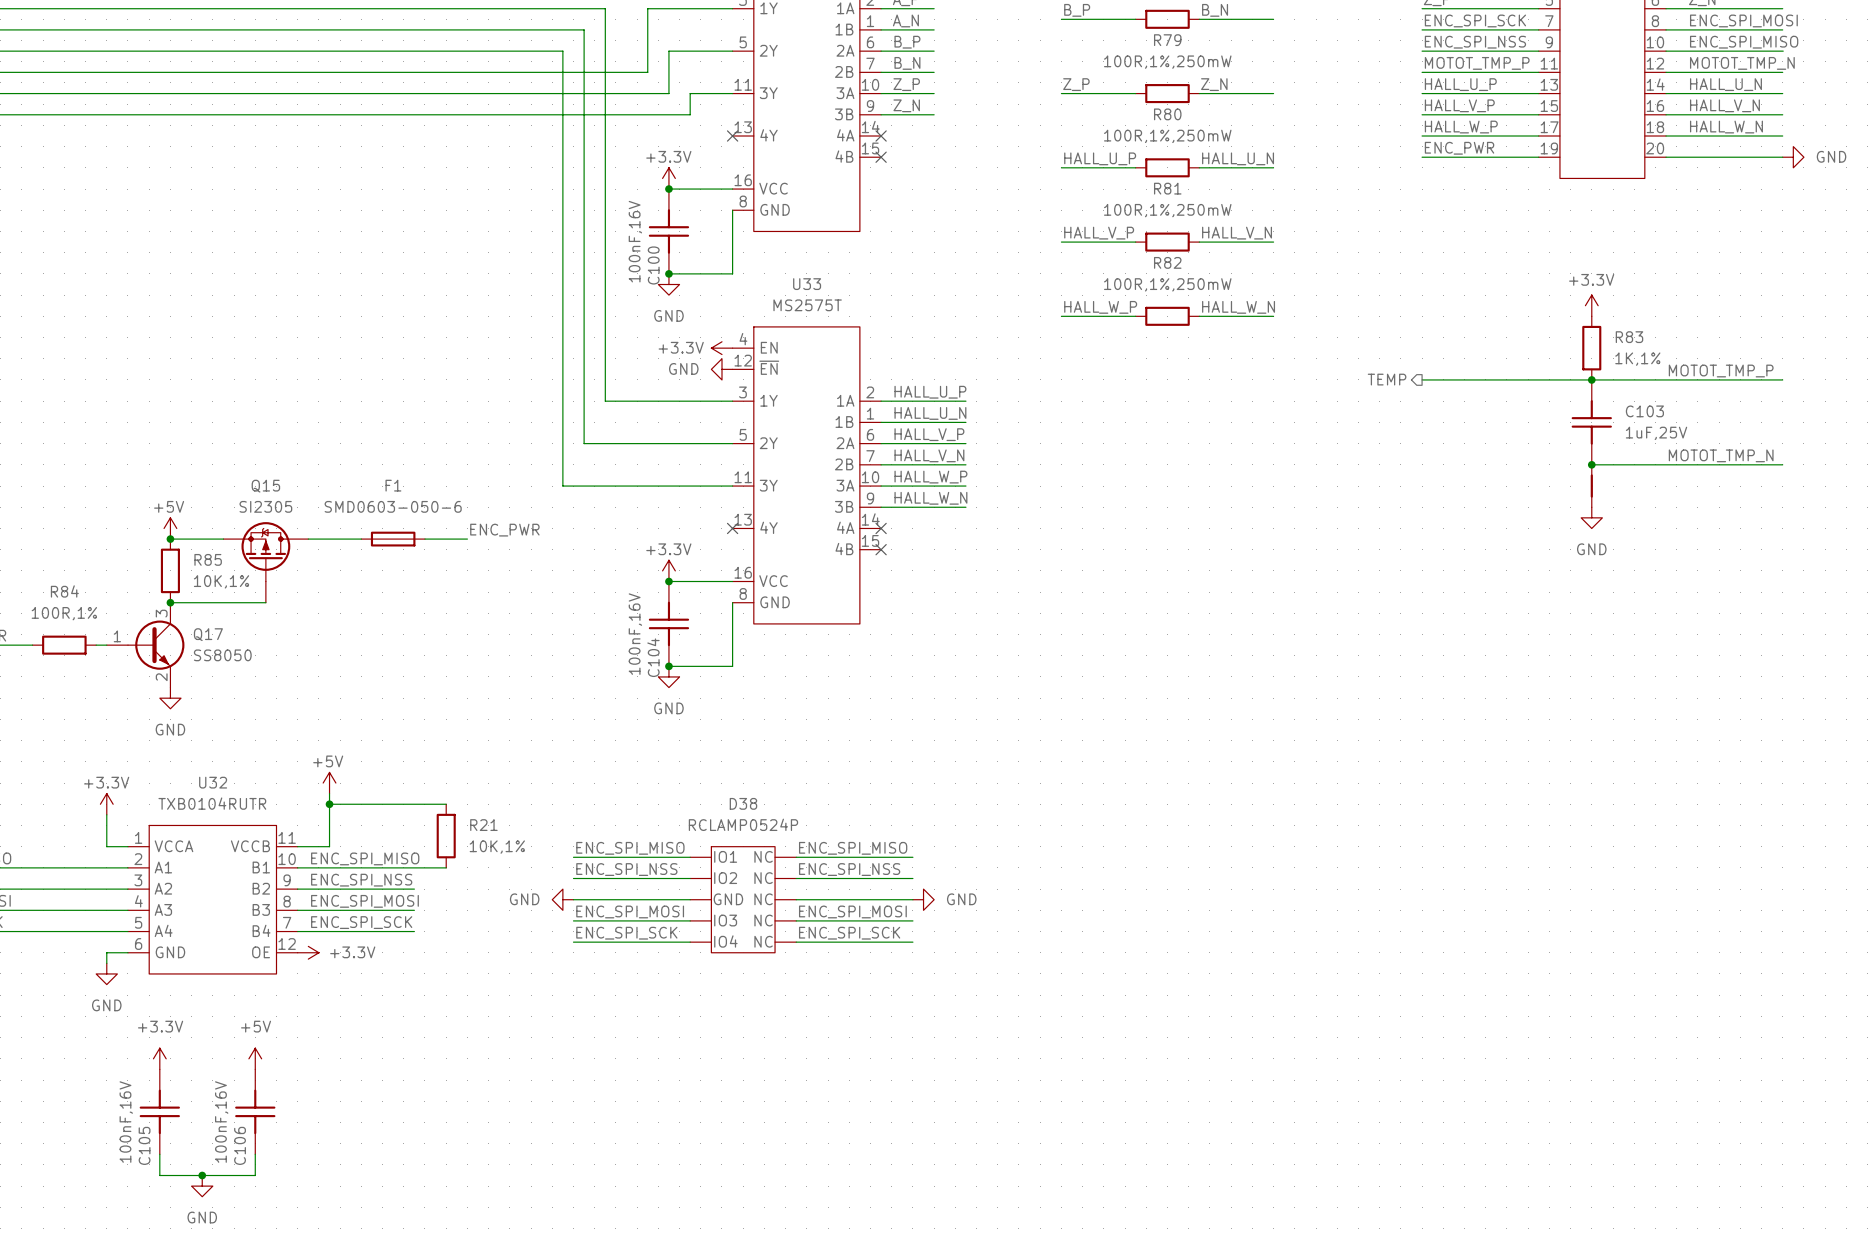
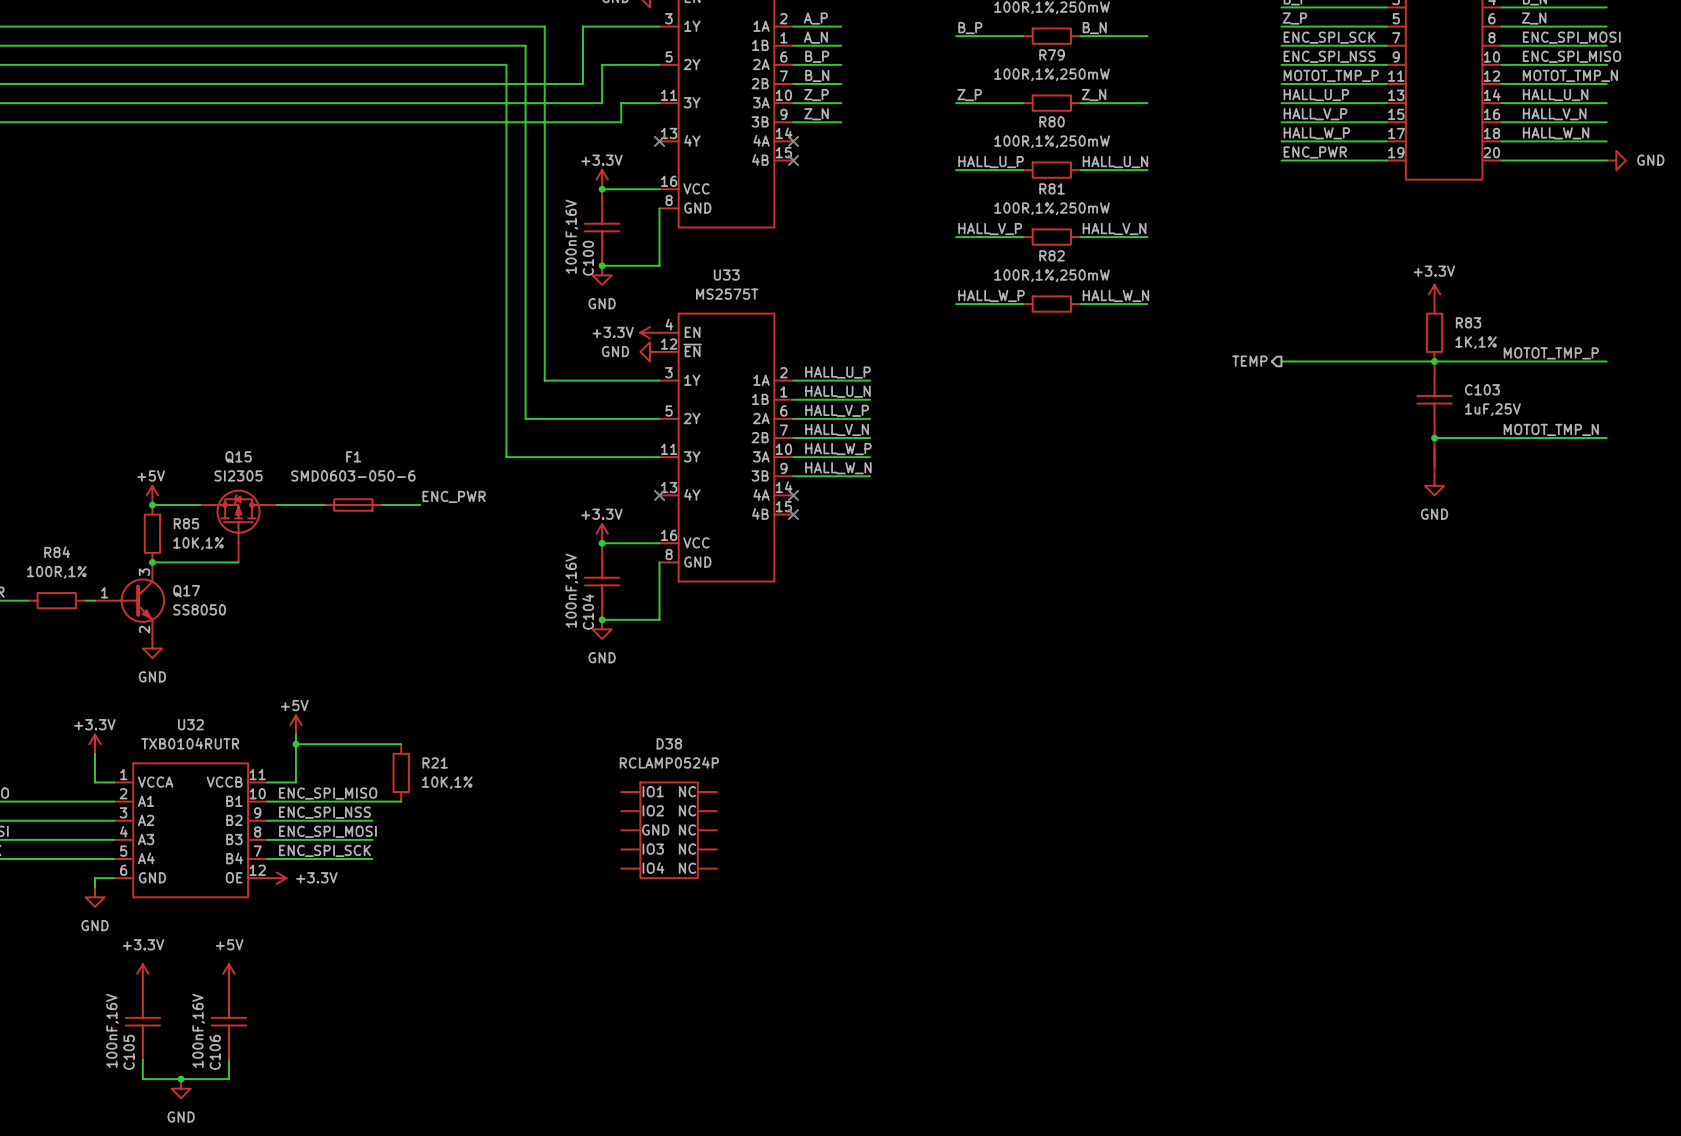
label: ENC_SPI_MISO (630, 848) -> none
label: ENC_SPI_MISO (853, 848) -> none
wire: (573, 857) (690, 857) -> none
wire: (796, 857) (912, 857) -> none
label: ENC_SPI_NSS (626, 869) -> none
label: ENC_SPI_NSS (849, 869) -> none
wire: (573, 878) (690, 878) -> none
wire: (796, 878) (912, 878) -> none
power symbol: GND (562, 899) -> none
wire: (573, 899) (690, 899) -> none
wire: (796, 899) (912, 899) -> none
power symbol: GND (923, 899) -> none
label: ENC_SPI_MOSI (630, 911) -> none
label: ENC_SPI_MOSI (852, 911) -> none
wire: (573, 920) (690, 920) -> none
wire: (796, 920) (912, 920) -> none
label: ENC_SPI_SCK (626, 933) -> none
label: ENC_SPI_SCK (849, 933) -> none
wire: (573, 942) (690, 942) -> none
wire: (796, 942) (912, 942) -> none

